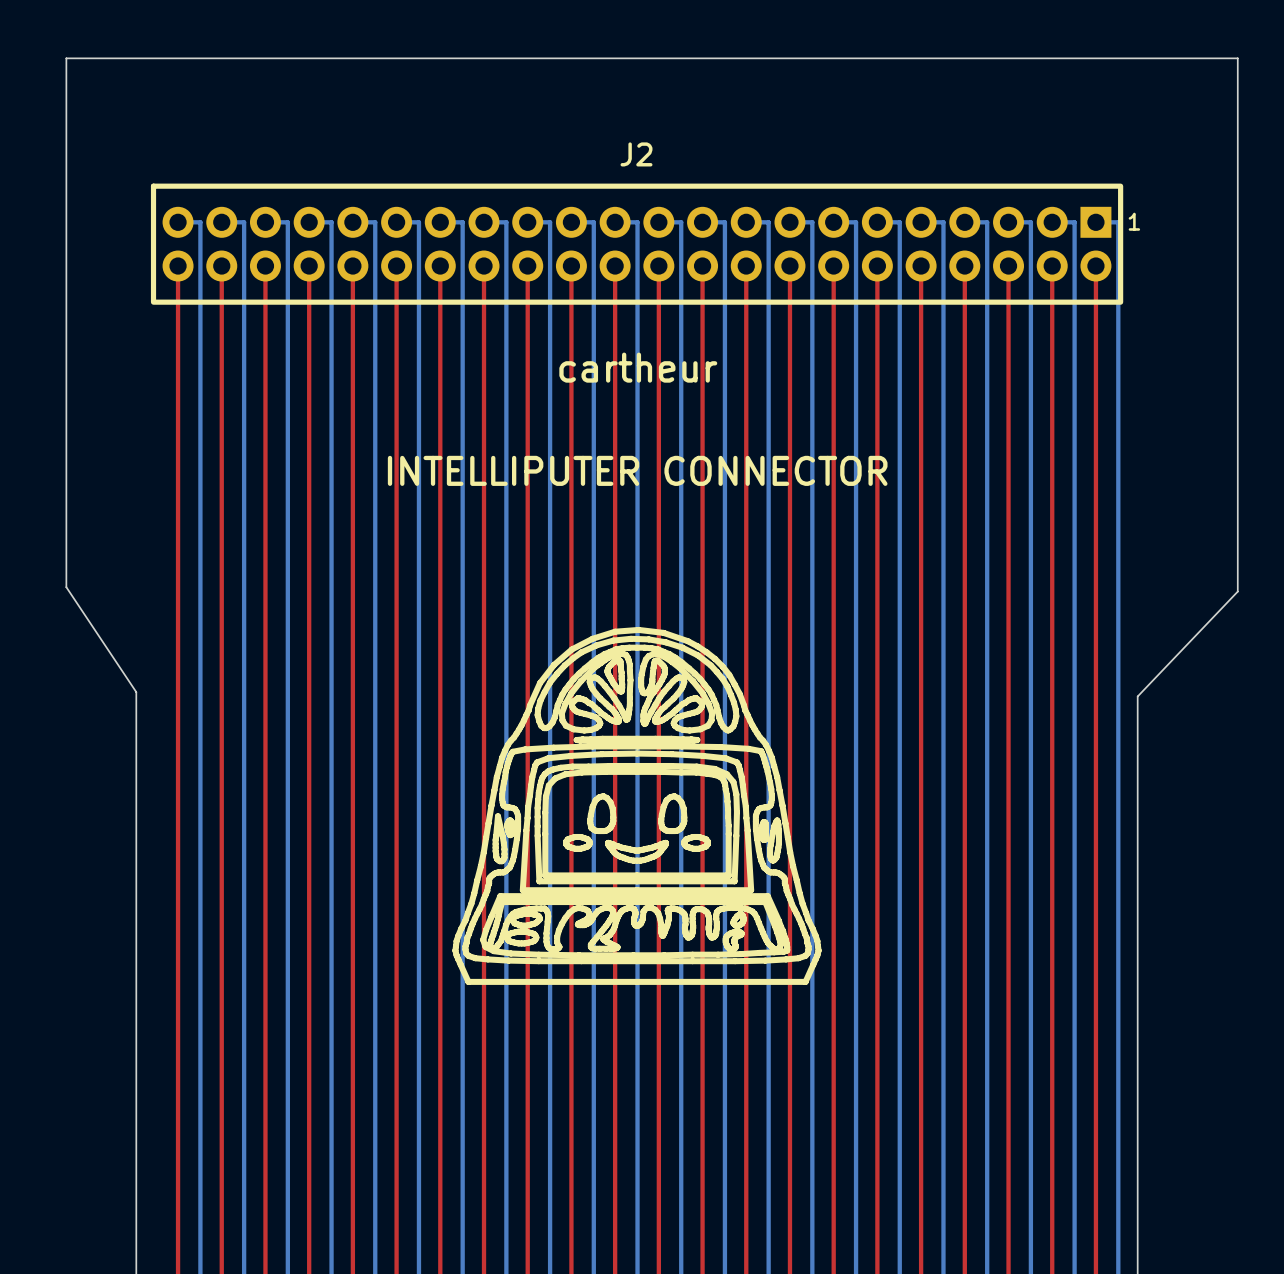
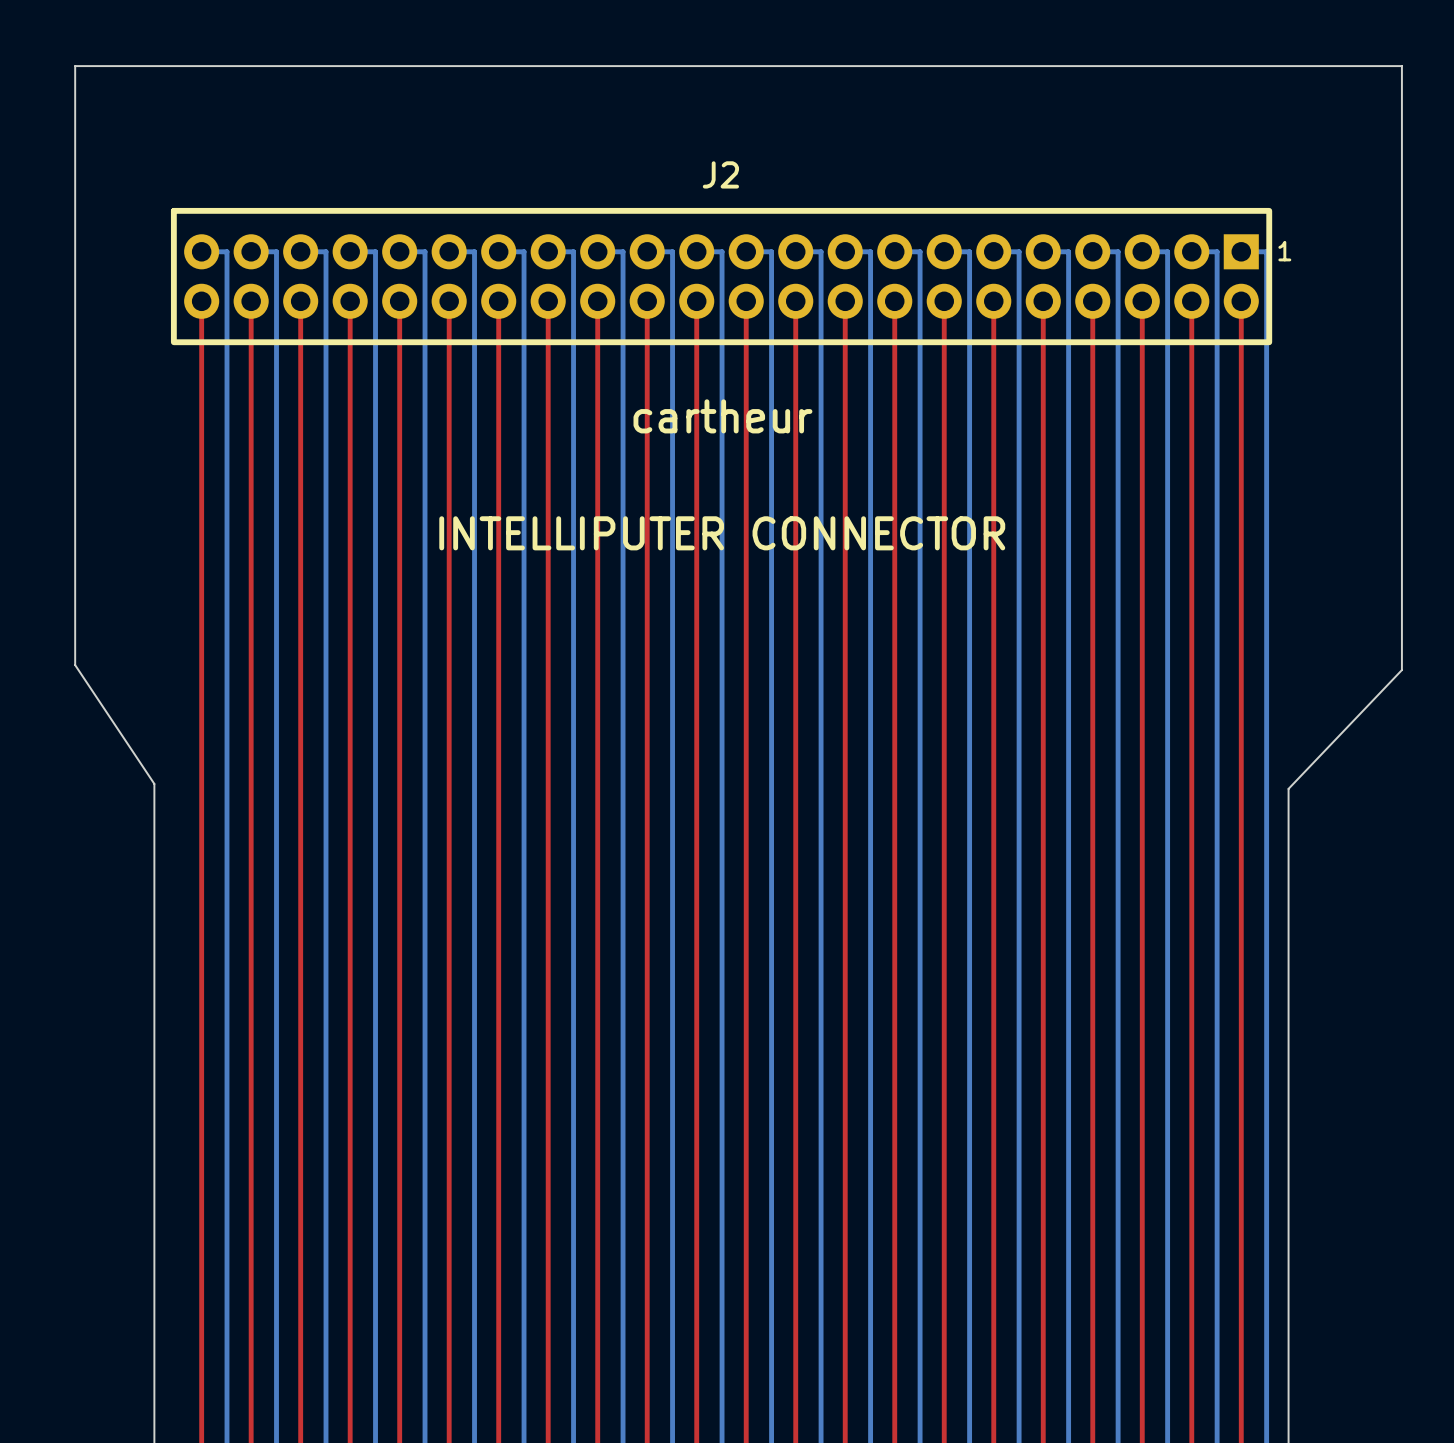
line: (638, 629) (615, 631) (592, 638) (571, 649) (554, 664) (539, 683) (521, 725) (505, 750) (496, 777) (483, 852) (474, 893) (456, 941) (456, 955) (468, 981) (805, 981) (817, 955) (817, 941) (799, 893) (790, 852) (777, 777) (768, 750) (752, 725) (739, 694) (729, 674) (715, 658) (687, 641) (663, 632) (638, 629) -> none
line: (631, 638) (648, 639) (682, 647) (697, 655) (710, 665) (722, 679) (734, 702) (736, 716) (733, 726) (728, 730) (723, 726) (711, 694) (700, 679) (689, 668) (669, 654) (658, 649) (644, 647) (615, 649) (592, 662) (573, 679) (565, 689) (557, 705) (552, 722) (546, 728) (541, 725) (537, 715) (540, 700) (550, 682) (564, 665) (581, 652) (596, 645) (613, 640) (631, 638) -> none
line: (620, 653) (625, 654) (629, 664) (629, 704) (627, 719) (609, 692) (594, 677) (592, 677) (589, 681) (592, 689) (612, 709) (618, 721) (610, 719) (592, 704) (578, 697) (572, 702) (574, 709) (596, 717) (600, 723) (596, 728) (584, 730) (573, 729) (566, 725) (562, 720) (561, 713) (571, 693) (597, 665) (608, 657) (620, 653) -> none
line: (653, 654) (664, 657) (680, 668) (702, 693) (712, 713) (711, 720) (707, 725) (700, 729) (689, 730) (677, 728) (673, 723) (677, 717) (699, 709) (701, 702) (695, 697) (681, 704) (663, 719) (655, 721) (661, 709) (681, 689) (684, 681) (681, 677) (678, 677) (664, 691) (644, 723) (645, 708) (664, 673) (663, 666) (657, 660) (654, 661) (651, 686) (647, 692) (642, 692) (641, 679) (643, 666) (648, 655) (653, 654) -> none
line: (617, 660) (609, 666) (607, 671) (613, 683) (621, 691) (620, 661) (617, 660) -> none
line: (602, 738) (671, 738) (697, 739) (650, 741) (576, 739) (602, 738) -> none
line: (592, 746) (720, 747) (761, 751) (767, 771) (771, 799) (770, 805) (758, 809) (755, 815) (760, 855) (764, 867) (770, 872) (778, 873) (784, 877) (786, 890) (806, 938) (808, 949) (805, 955) (786, 959) (735, 961) (508, 960) (475, 958) (468, 955) (465, 949) (467, 938) (487, 890) (489, 877) (495, 873) (503, 872) (509, 867) (513, 855) (518, 815) (515, 809) (503, 805) (502, 799) (505, 771) (511, 753) (525, 749) (592, 746) -> none
line: (636, 753) (570, 755) (548, 758) (537, 762) (532, 777) (528, 806) (522, 890) (751, 890) (745, 806) (741, 777) (736, 762) (725, 758) (703, 755) (636, 753) -> none
line: (609, 765) (696, 766) (715, 768) (726, 774) (733, 781) (736, 794) (734, 881) (539, 881) (537, 807) (542, 777) (548, 771) (560, 767) (609, 765) -> none
line: (605, 771) (565, 774) (555, 778) (548, 785) (545, 796) (545, 875) (728, 875) (728, 809) (722, 779) (714, 774) (696, 772) (605, 771) -> none
line: (603, 796) (610, 802) (613, 821) (610, 828) (606, 830) (597, 831) (591, 828) (590, 815) (595, 800) (603, 796) -> none
line: (674, 796) (681, 802) (684, 821) (681, 828) (677, 830) (668, 831) (662, 828) (661, 815) (666, 800) (674, 796) -> none
line: (497, 816) (504, 849) (504, 857) (502, 861) (497, 859) (495, 851) (497, 816) -> none
line: (509, 820) (512, 822) (510, 835) (507, 827) (509, 820) -> none
line: (777, 820) (778, 843) (776, 857) (773, 860) (770, 857) (770, 848) (777, 820) -> none
line: (763, 822) (765, 823) (764, 839) (761, 832) (763, 822) -> none
line: (575, 836) (587, 839) (589, 844) (580, 848) (567, 846) (566, 844) (567, 839) (575, 836) -> none
line: (693, 836) (706, 839) (707, 844) (698, 848) (686, 846) (684, 844) (686, 839) (693, 836) -> none
line: (608, 842) (635, 850) (665, 844) (654, 856) (644, 860) (633, 860) (616, 854) (608, 842) -> none
line: (500, 896) (483, 939) (485, 947) (493, 951) (538, 954) (664, 955) (741, 954) (787, 950) (783, 931) (767, 896) (500, 896) -> none
line: (502, 902) (765, 902) (780, 944) (779, 948) (776, 949) (768, 943) (754, 913) (745, 908) (728, 907) (718, 910) (716, 915) (716, 933) (712, 937) (709, 933) (707, 913) (703, 909) (694, 909) (692, 915) (692, 935) (687, 937) (684, 929) (684, 915) (682, 912) (674, 908) (668, 909) (668, 918) (662, 935) (658, 913) (648, 907) (643, 911) (642, 920) (638, 925) (634, 923) (635, 913) (634, 909) (628, 907) (622, 910) (612, 931) (603, 939) (617, 947) (594, 948) (592, 948) (590, 944) (611, 918) (612, 910) (608, 907) (601, 909) (589, 922) (579, 925) (589, 915) (587, 910) (578, 907) (569, 912) (561, 923) (557, 936) (559, 947) (551, 949) (546, 941) (547, 912) (544, 908) (536, 908) (524, 909) (512, 913) (508, 920) (500, 941) (492, 949) (490, 943) (502, 902) -> none
line: (524, 913) (535, 915) (539, 918) (535, 923) (526, 925) (514, 923) (512, 919) (515, 916) (524, 913) -> none
line: (740, 913) (742, 915) (743, 920) (739, 925) (735, 925) (733, 922) (740, 913) -> none
line: (518, 931) (534, 933) (536, 937) (534, 941) (524, 943) (508, 939) (506, 937) (509, 933) (518, 931) -> none
line: (734, 932) (741, 933) (734, 939) (735, 948) (730, 949) (727, 947) (725, 938) (734, 932) -> none

